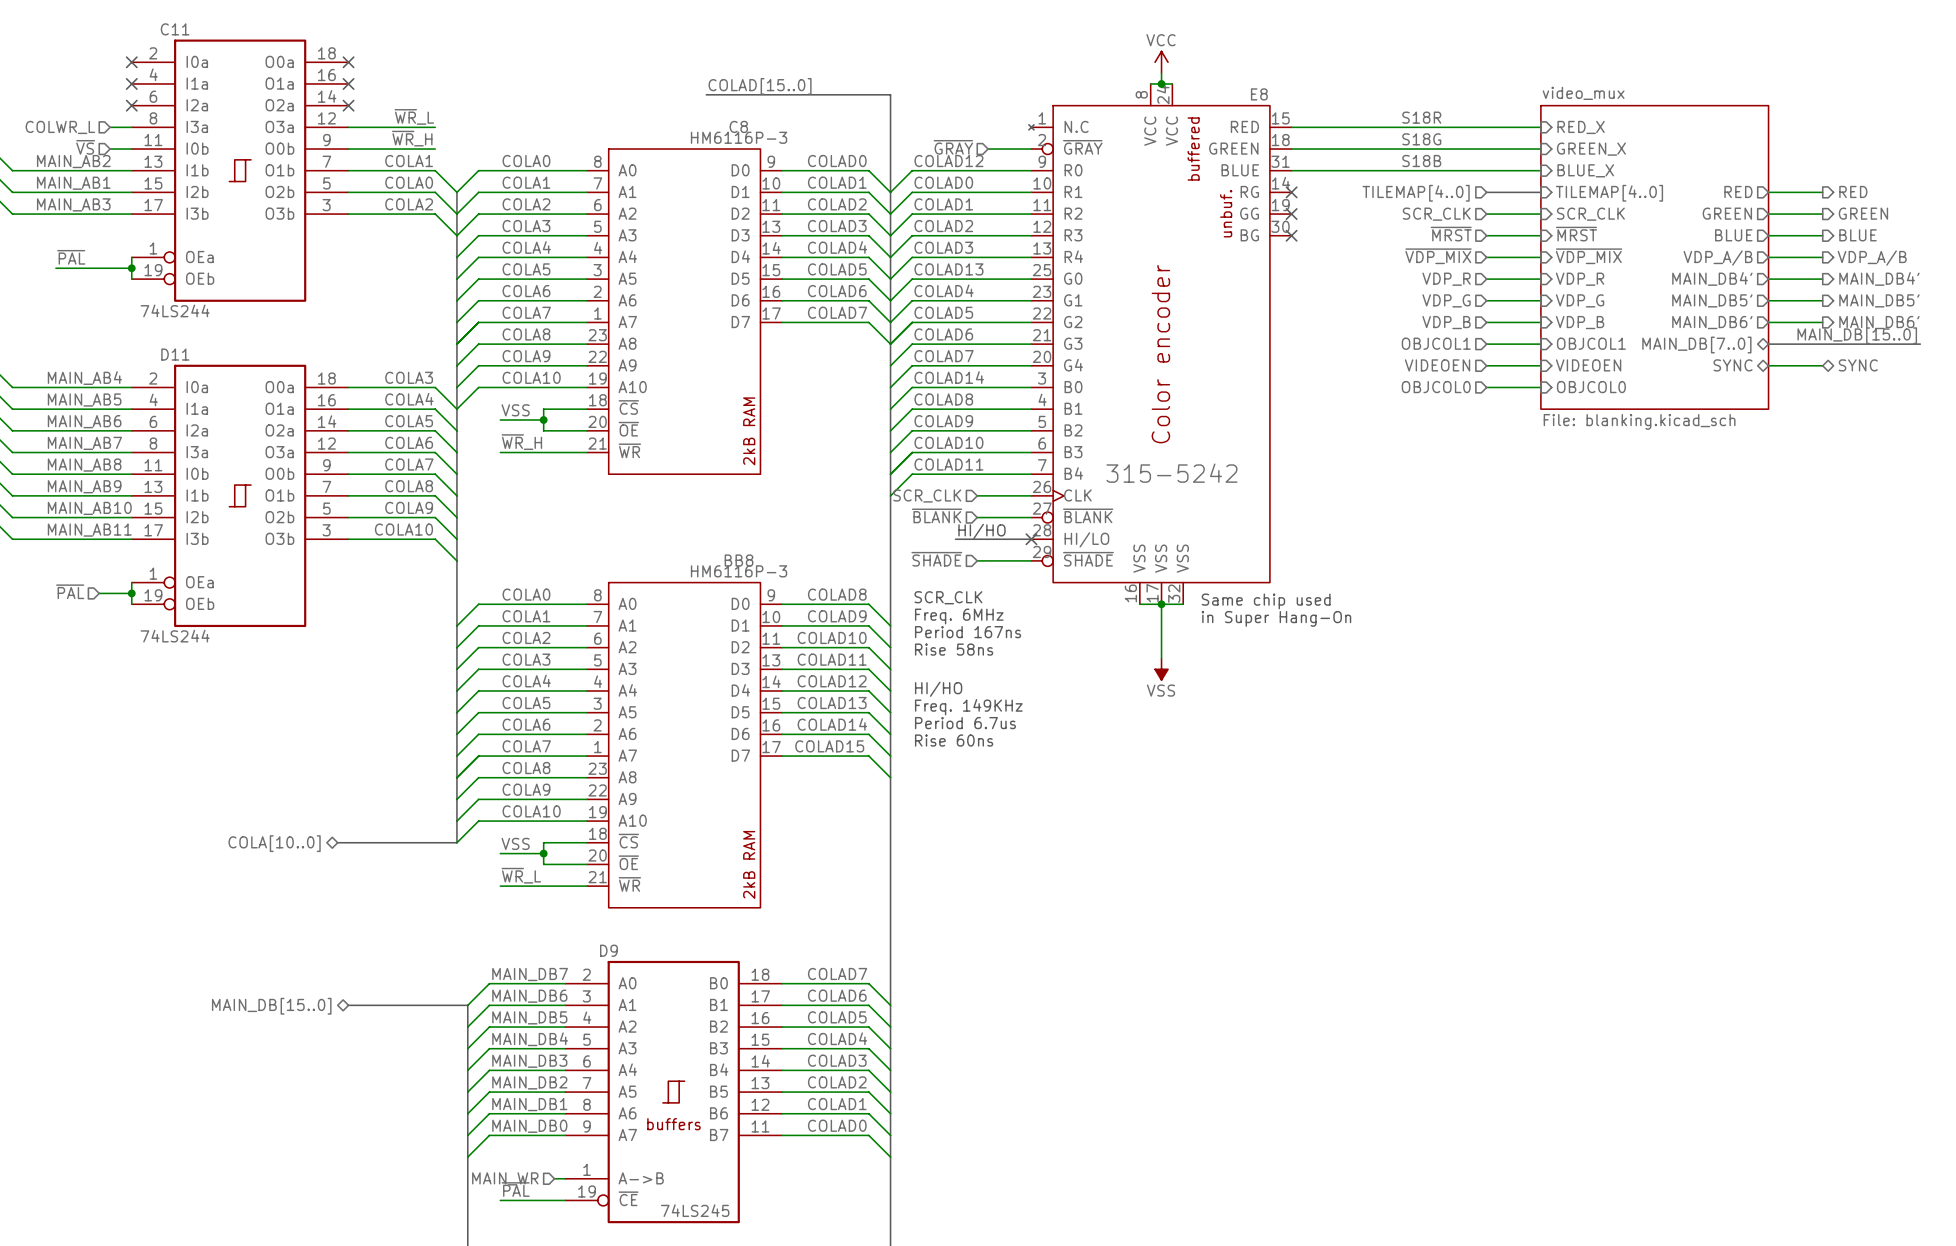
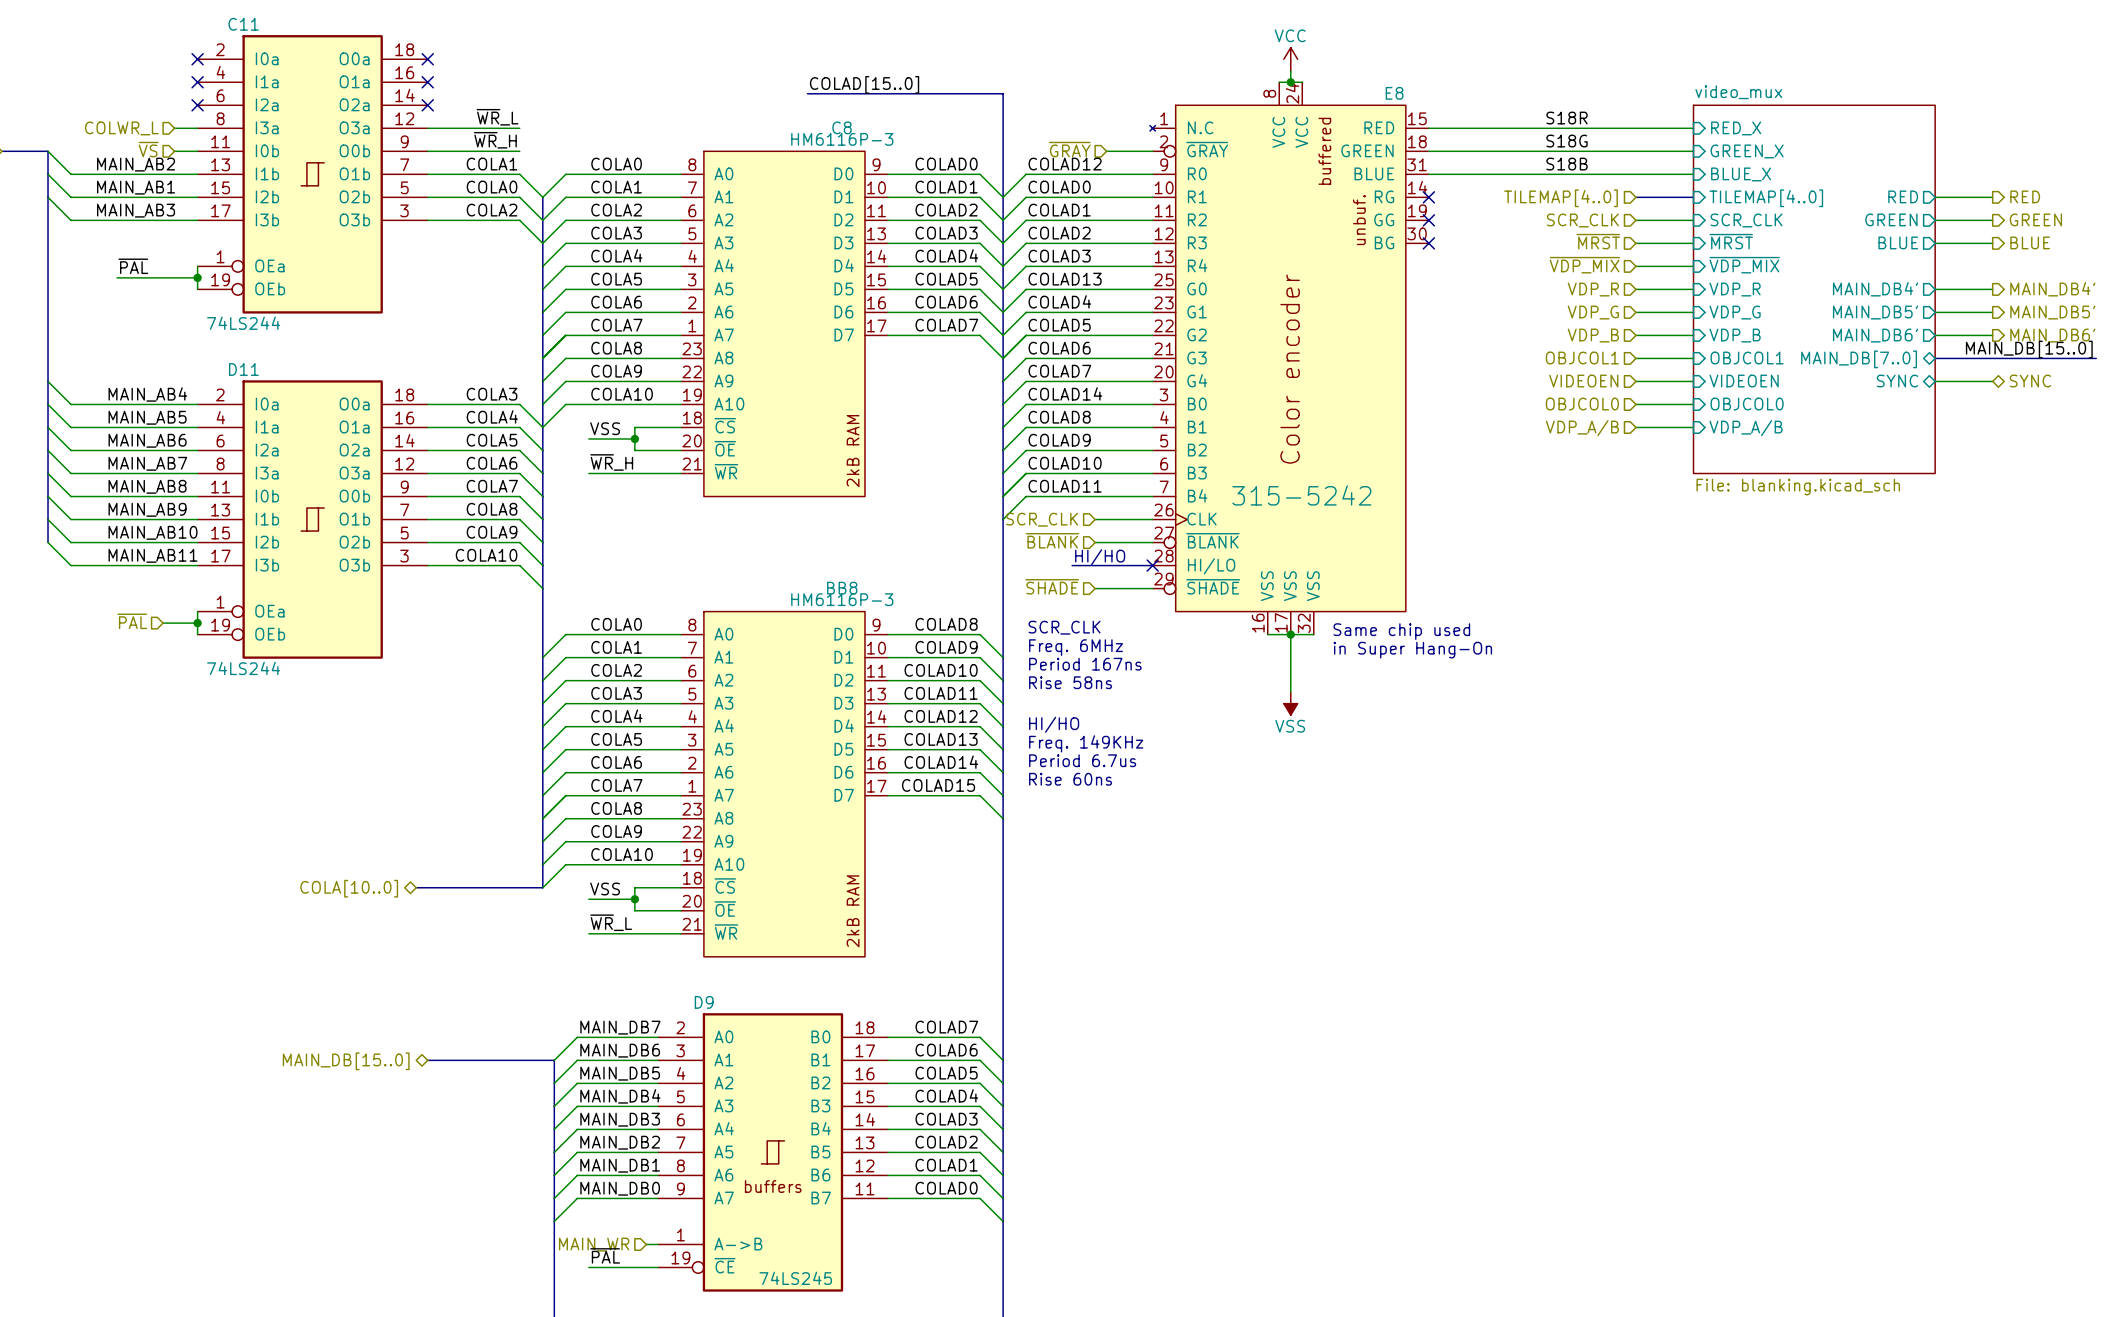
sheet video_mux: File: blanking.kicad_sch (1654, 257) -> none
wire: (1768, 257) (1822, 257) -> none
sheet pin: VDP_A/B (1718, 258) -> none
hierarchical label: VDP_A/B (1872, 258) -> none
sheet video_mux: none -> File: blanking.kicad_sch (1814, 289)
hierarchical label: none -> VDP_A/B (1582, 428)
wire: none -> (1635, 427) (1693, 427)
sheet pin: none -> VDP_A/B (1746, 428)

